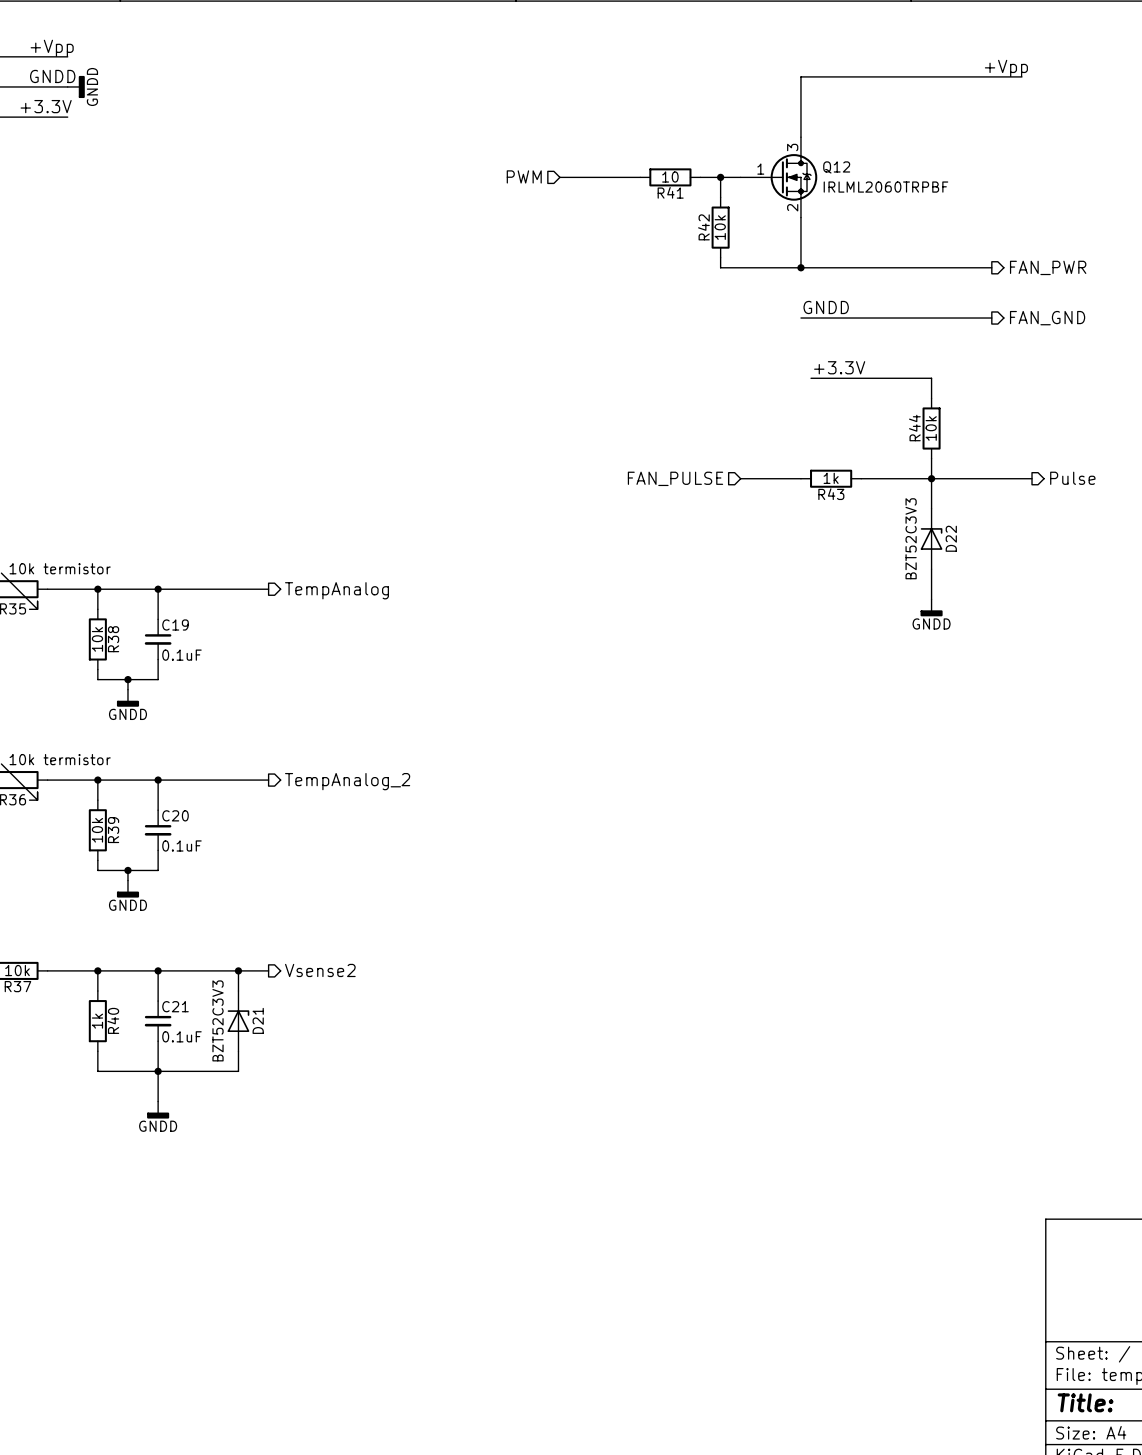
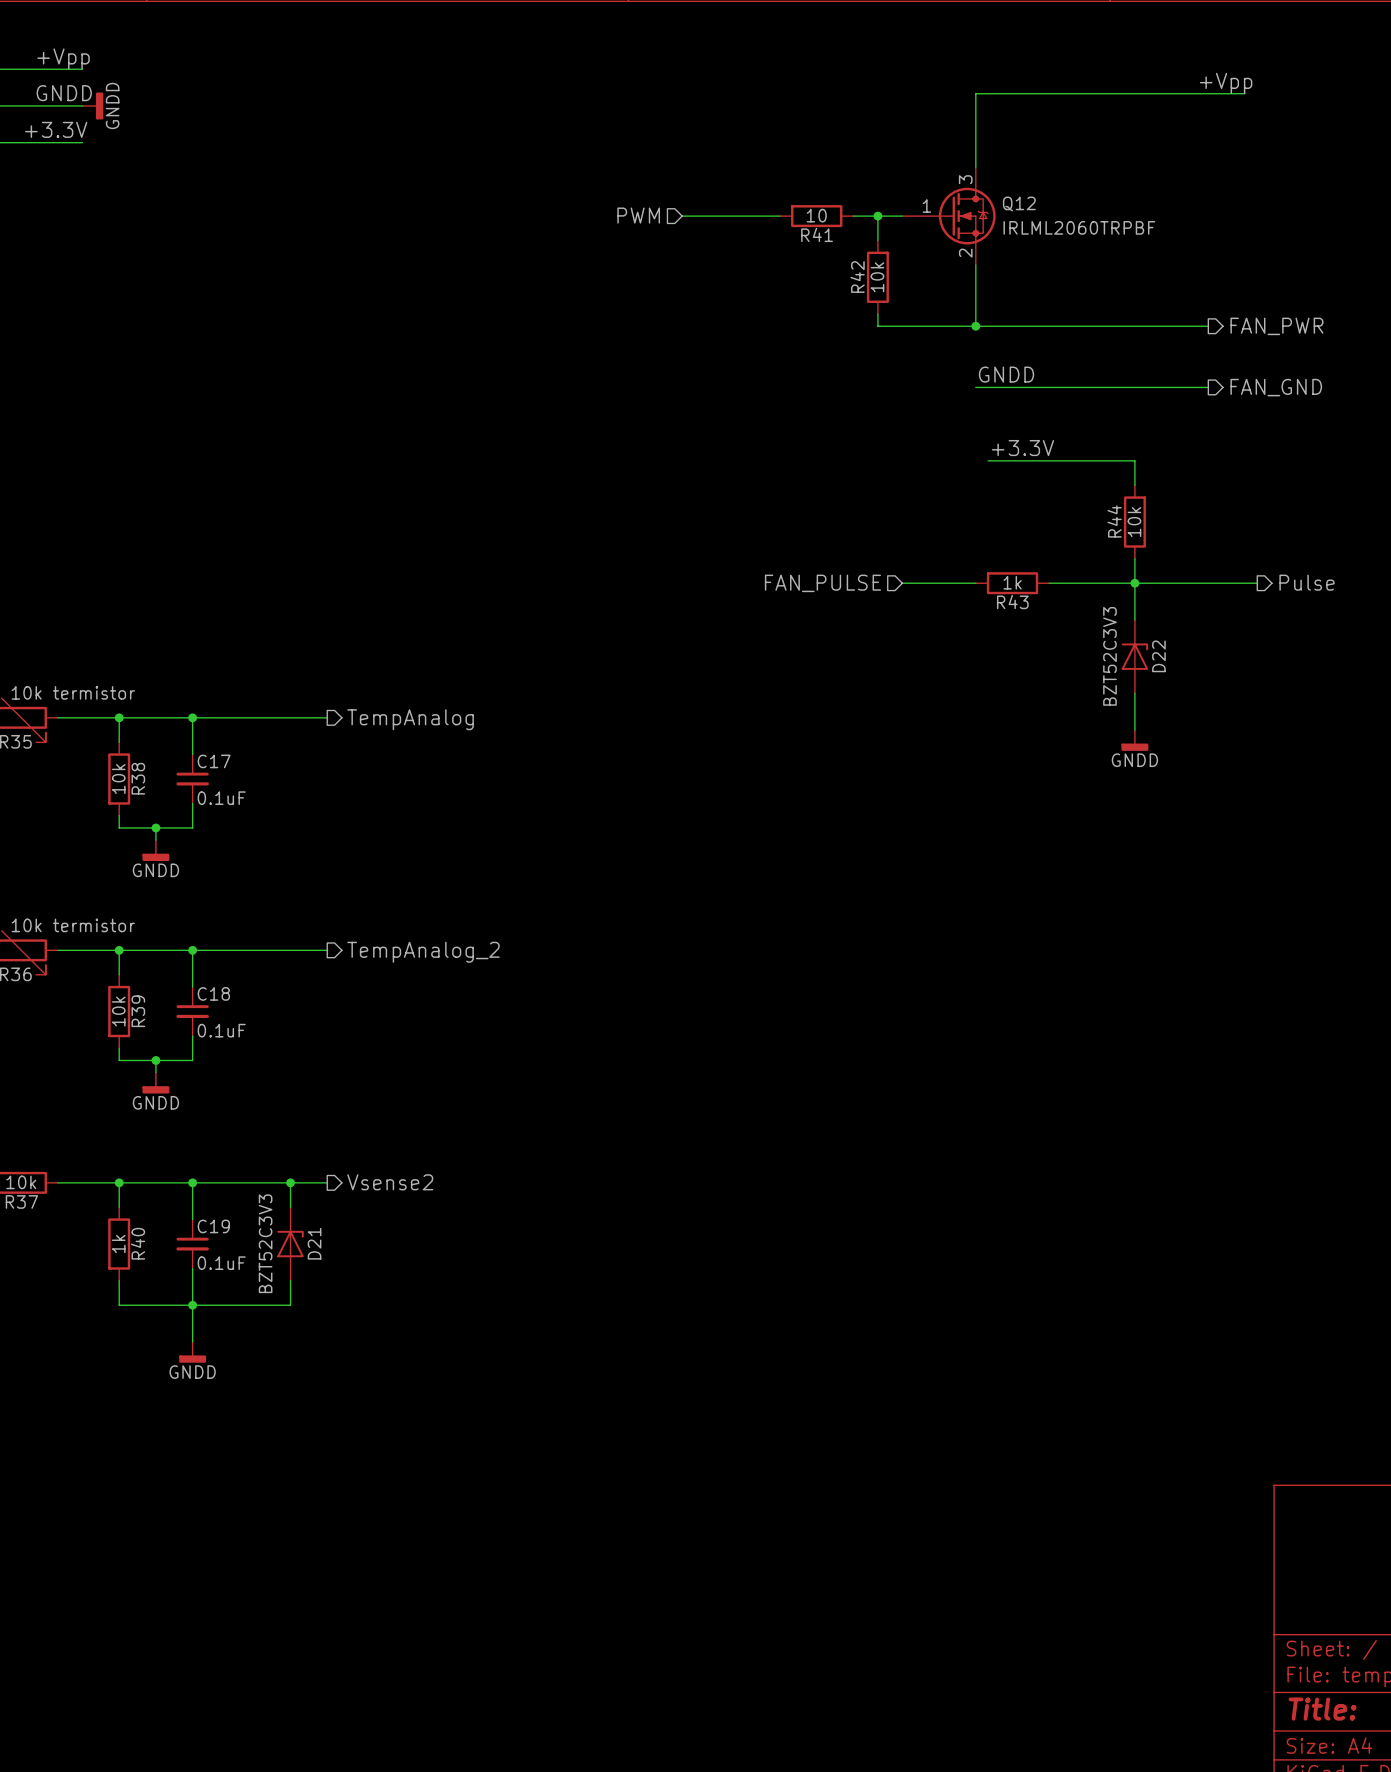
C19 name: C19 (175, 625) -> C17 (214, 761)
C20 name: C20 (175, 815) -> C18 (213, 993)
C21 name: C21 (175, 1006) -> C19 (213, 1226)

